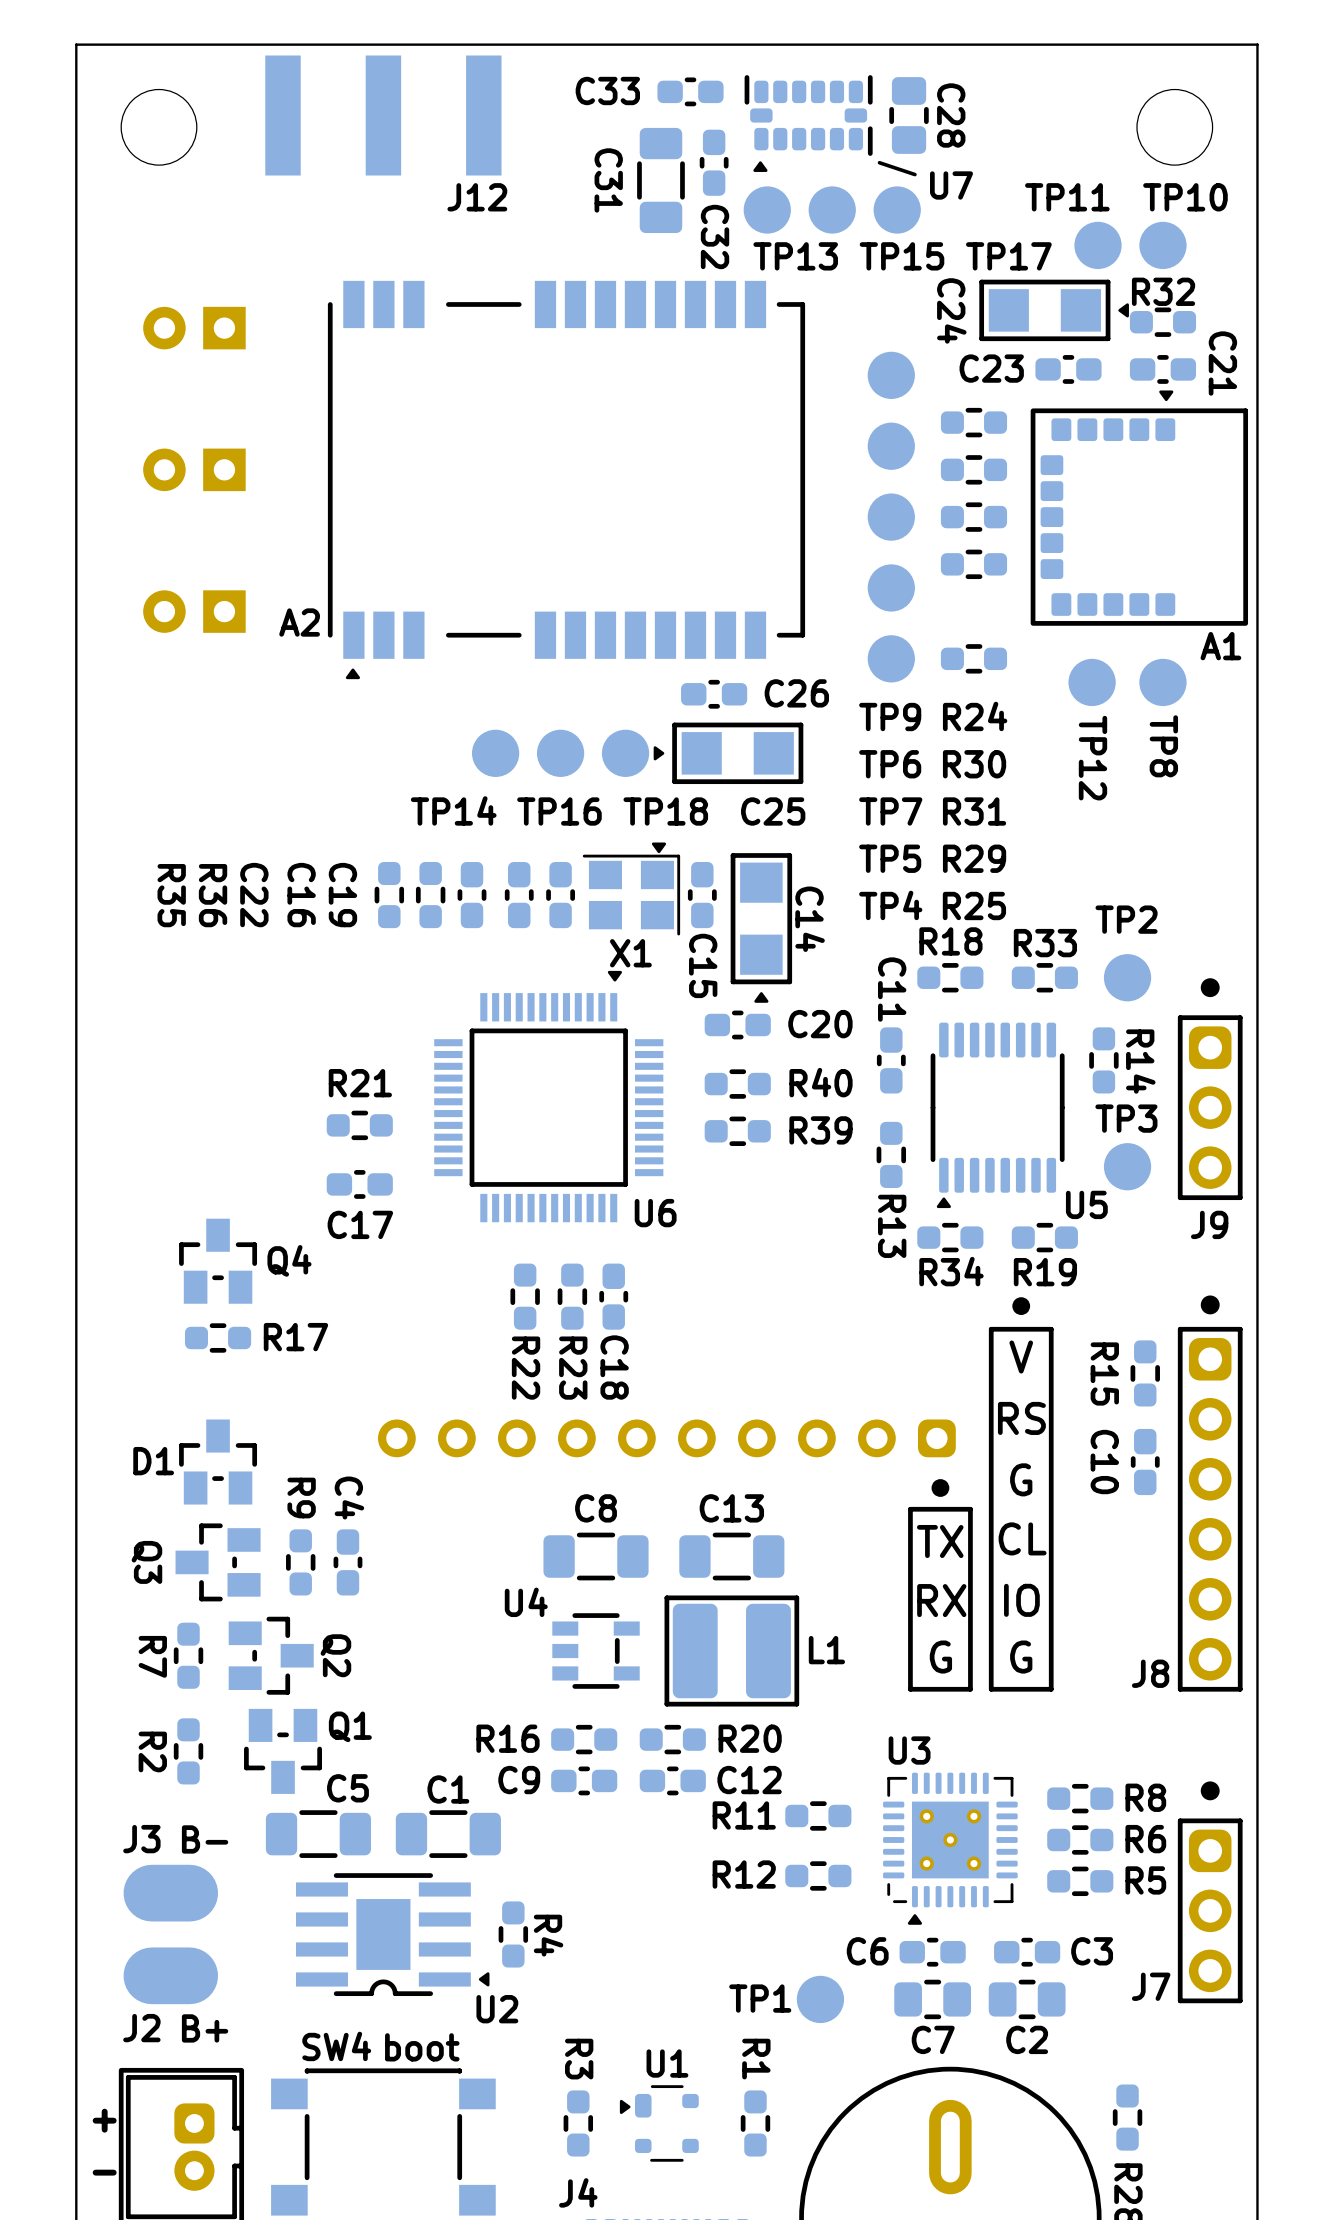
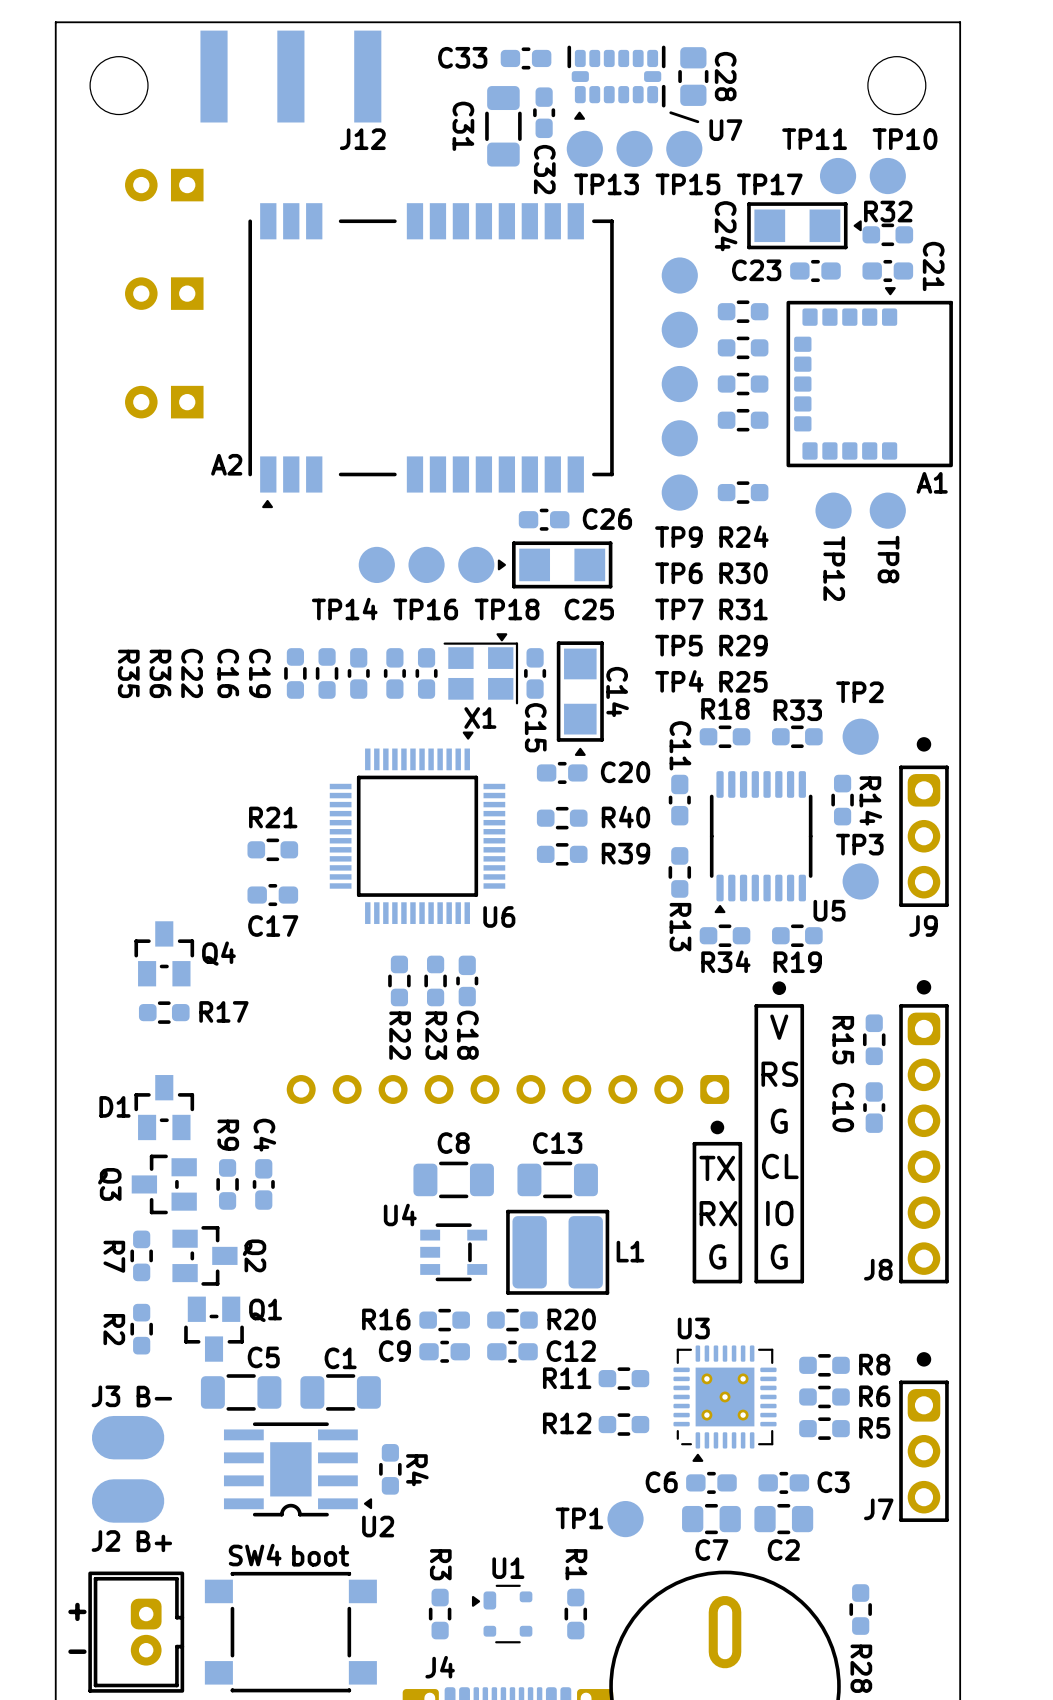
part: none -> (164, 185)
part: (194, 328) -> none
part: none -> (164, 293)
part: (194, 469) -> none
part: none -> (164, 402)
part: (194, 611) -> none

